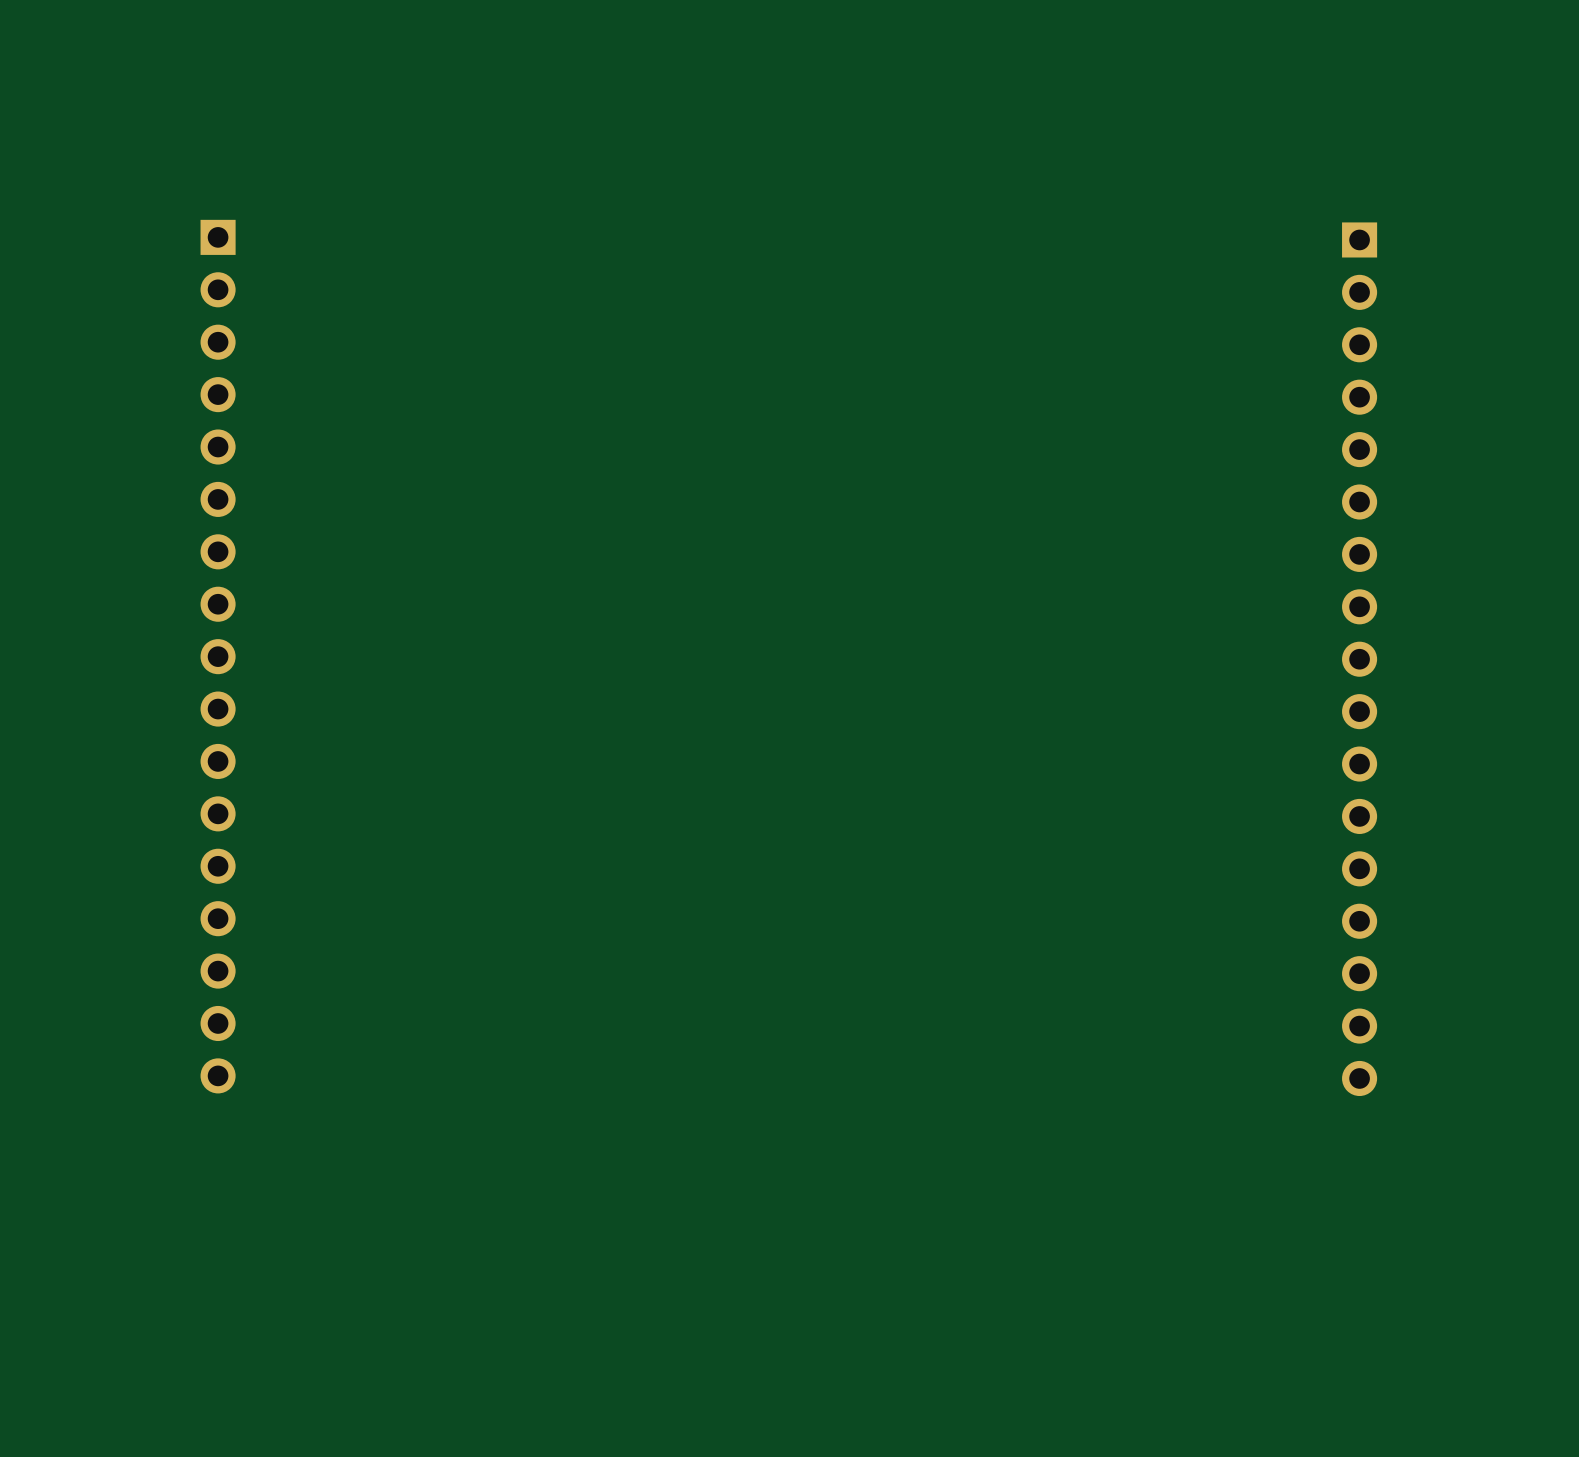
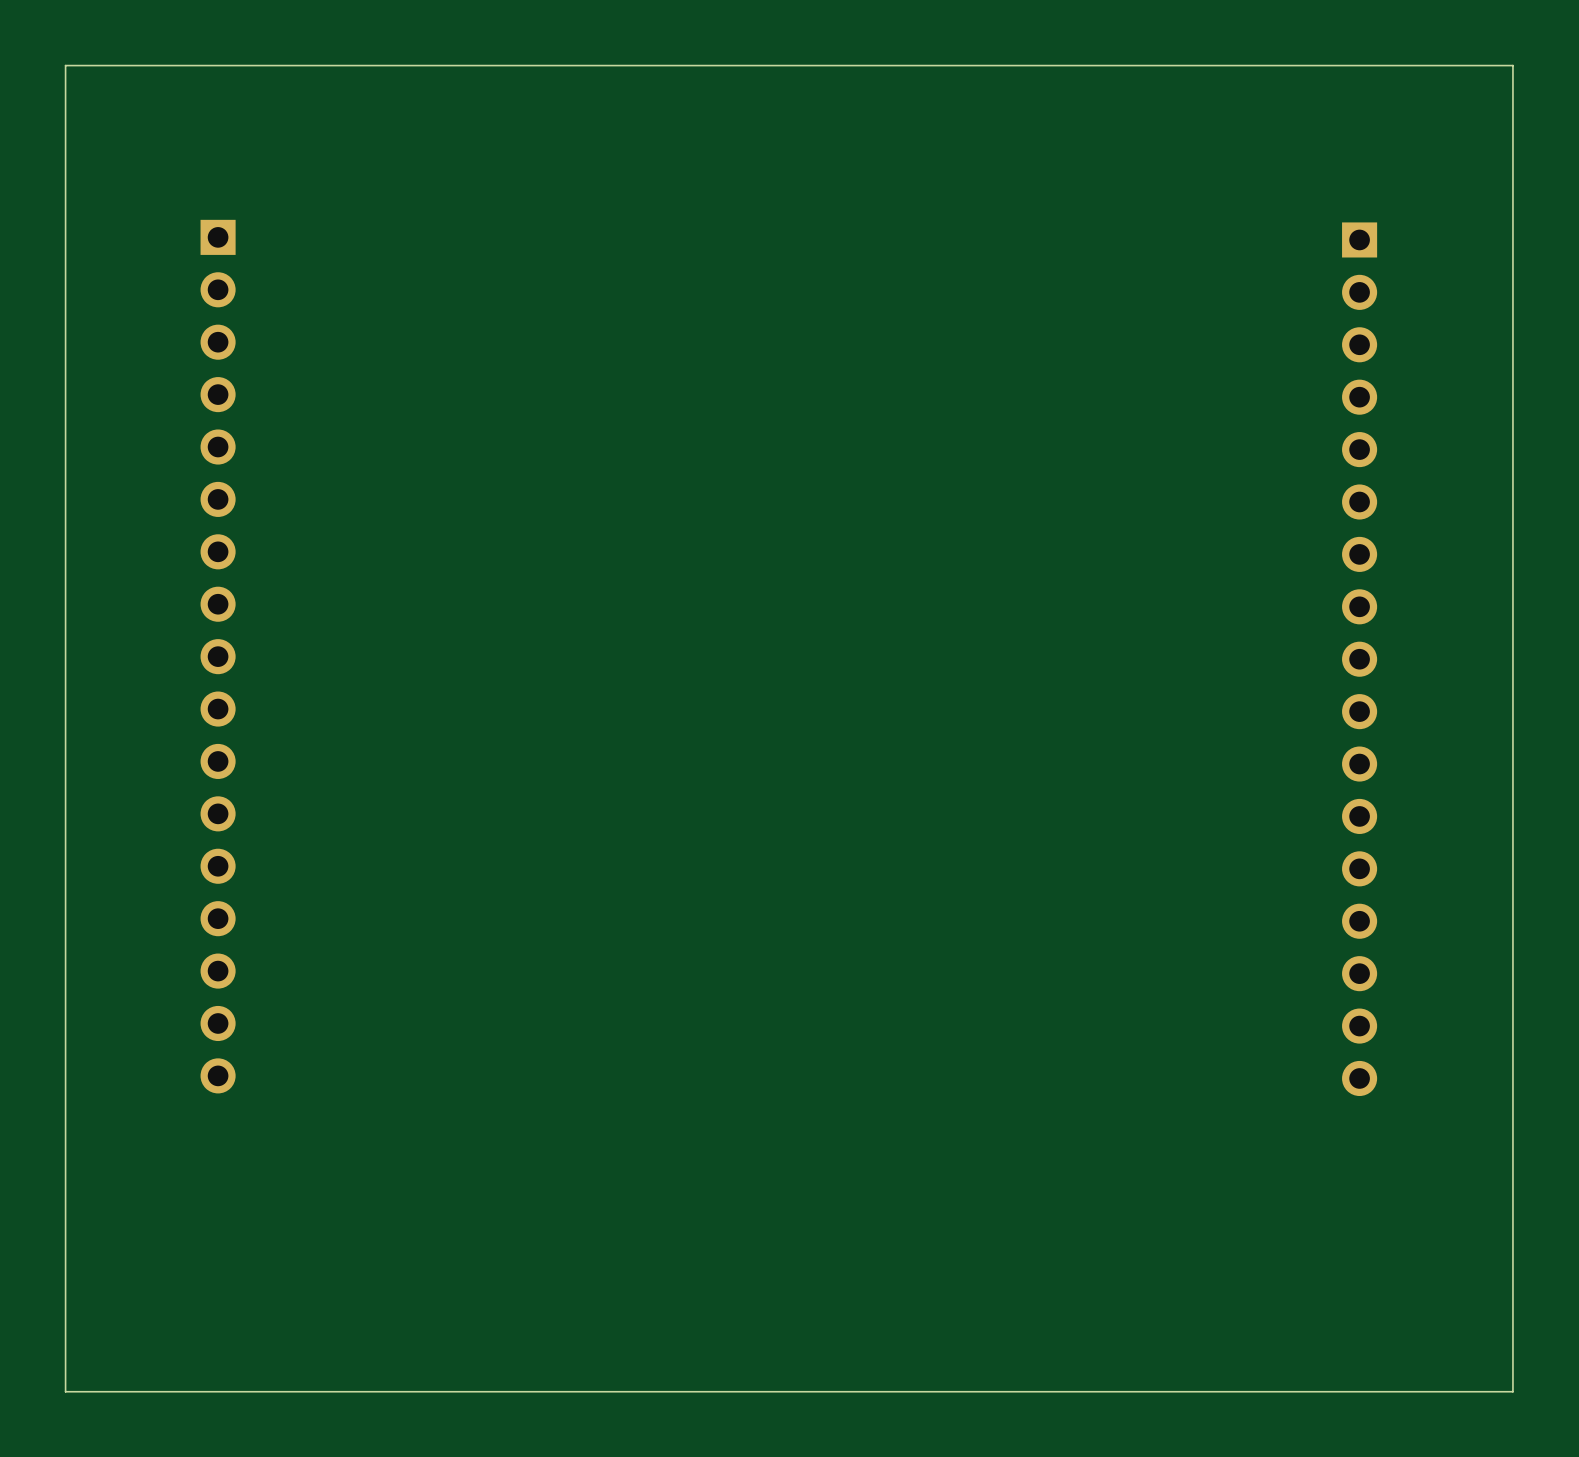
board edge: none -> (1512, 65) (65, 65) (65, 1391) (1512, 1391) (1512, 65)

